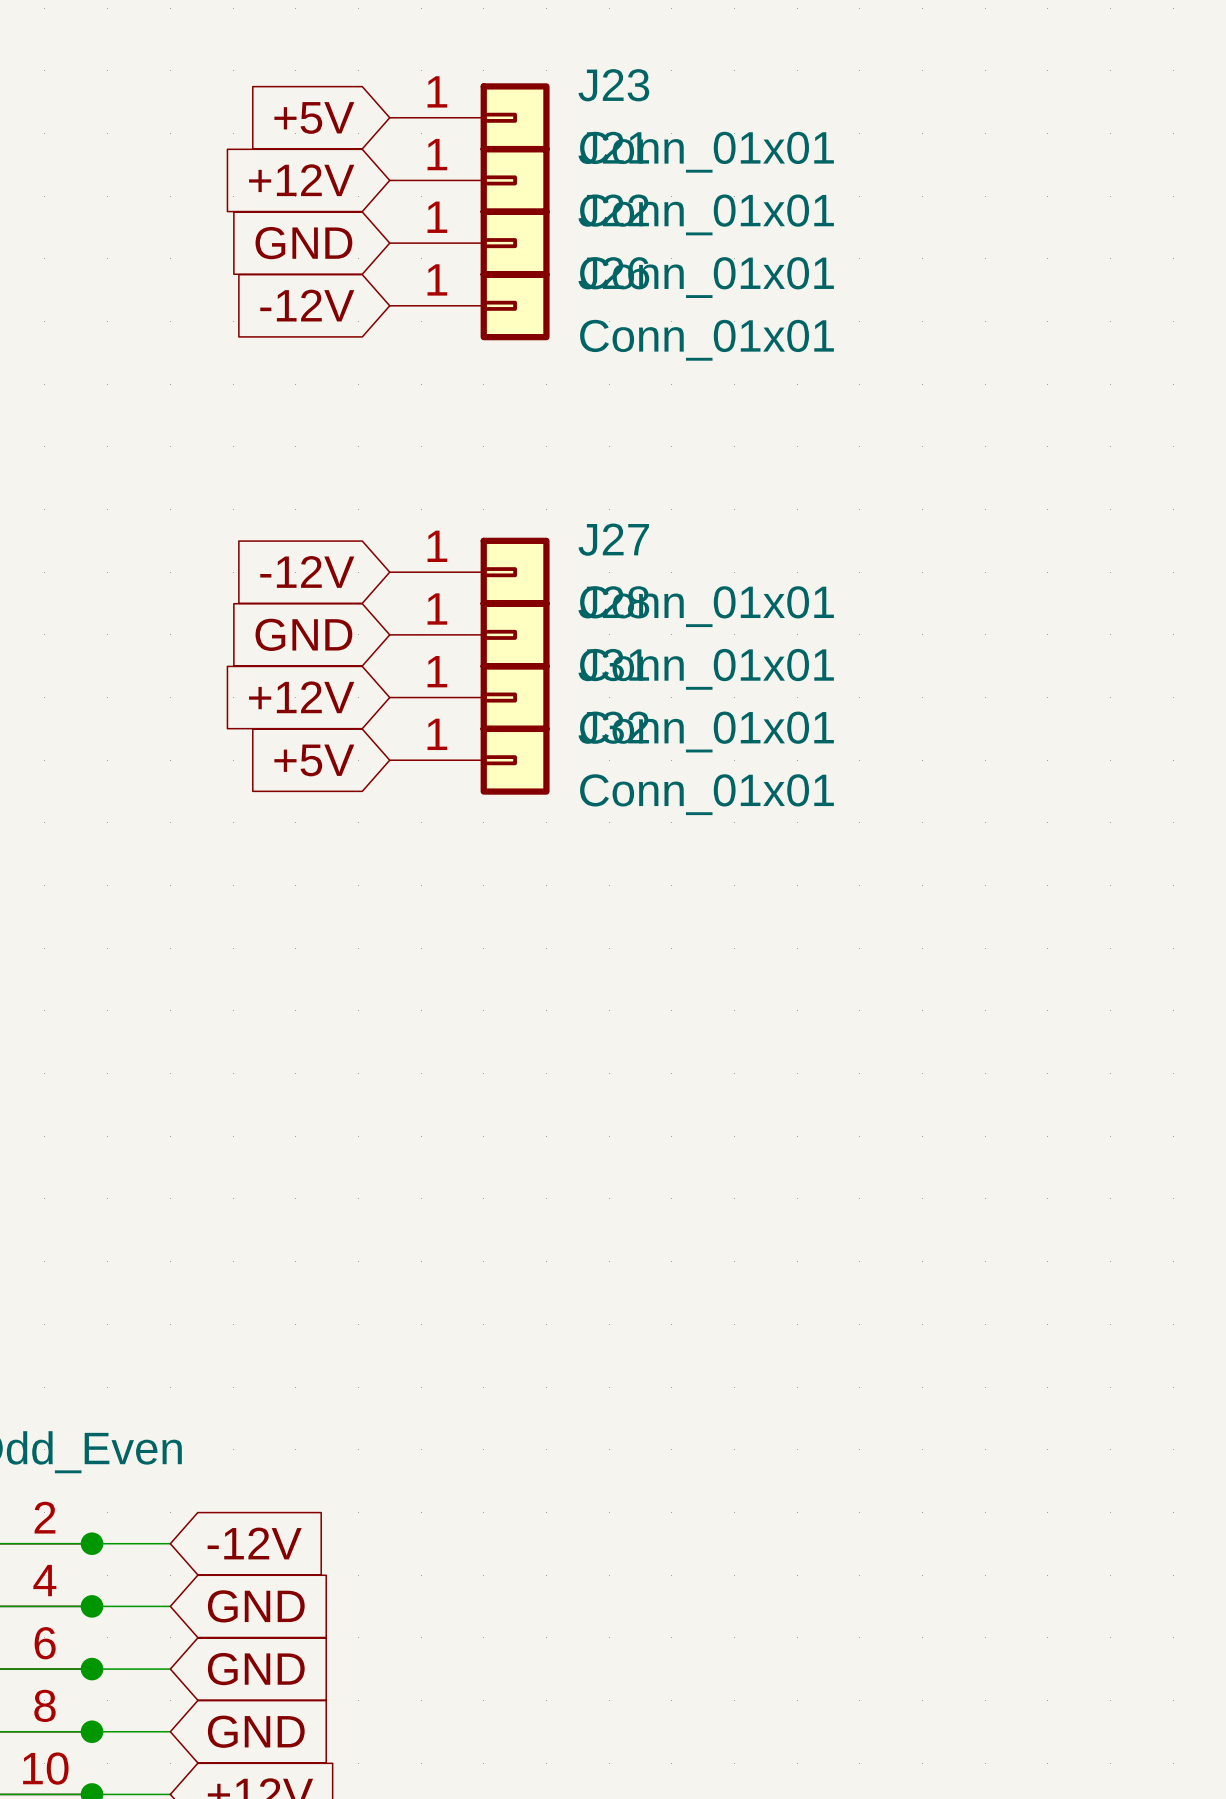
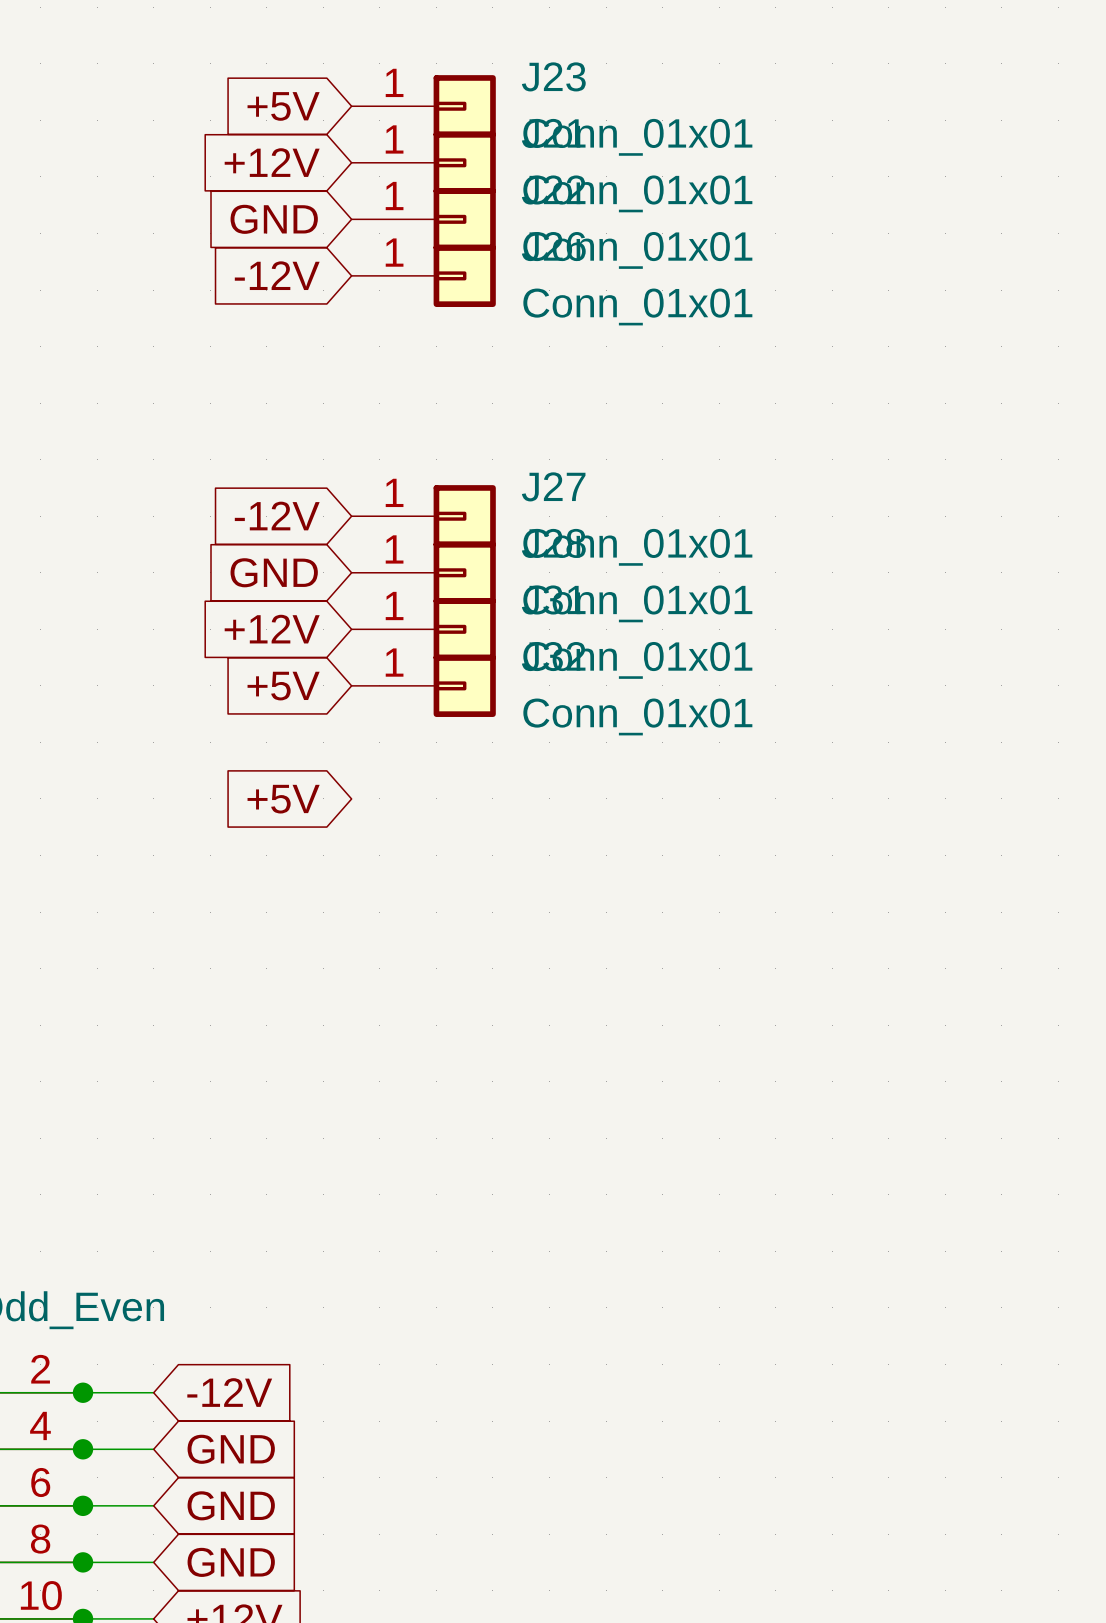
global label: none -> +5V (283, 799)

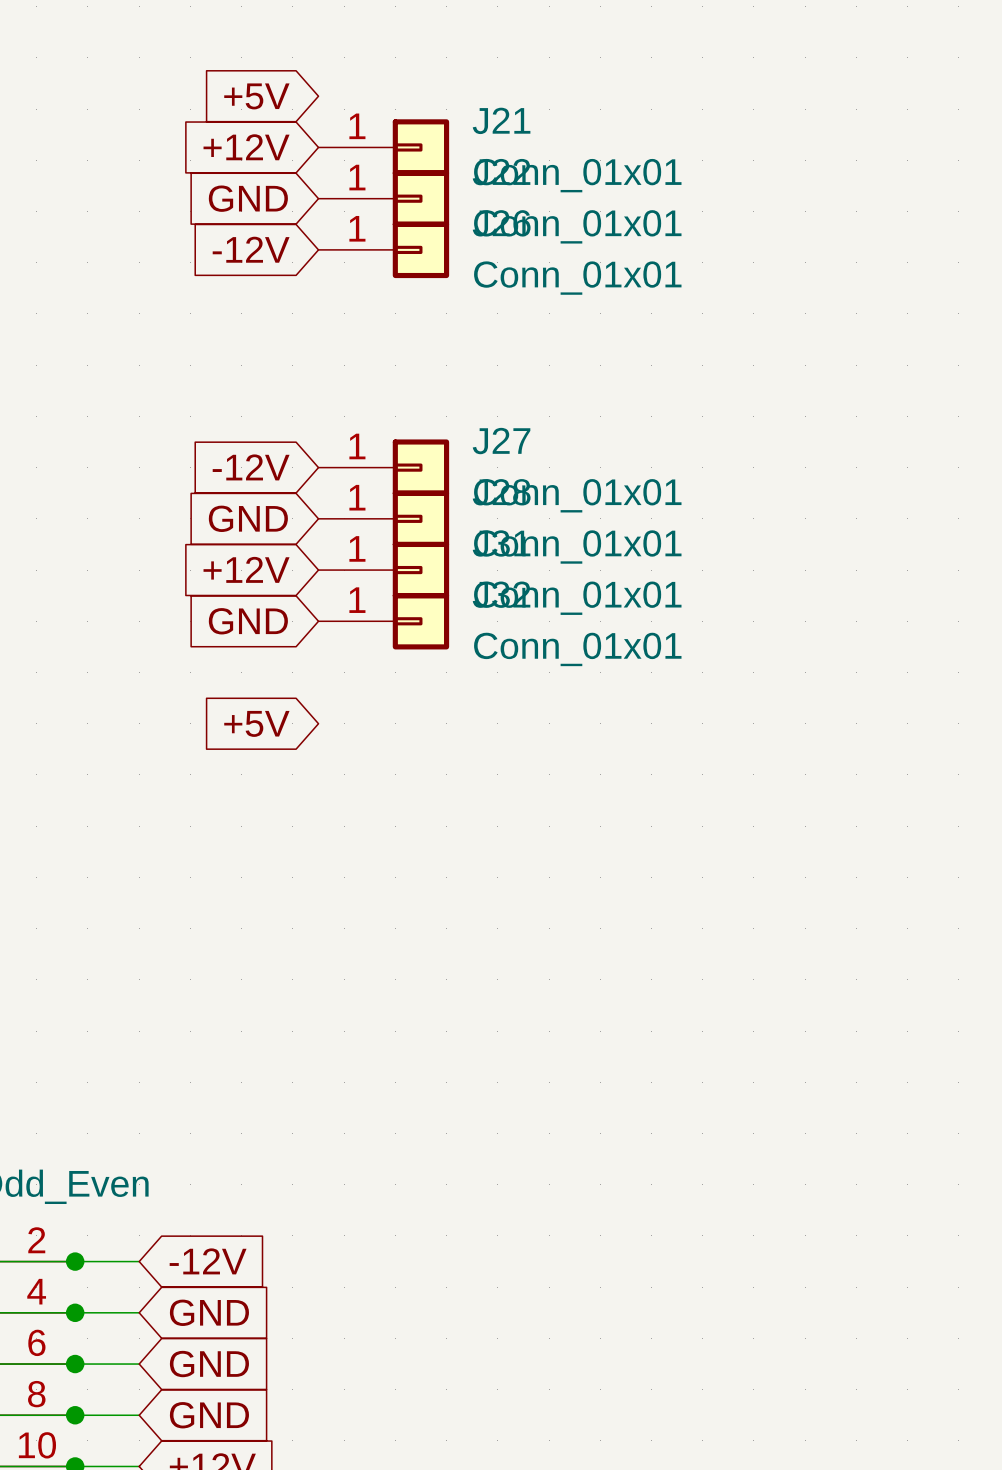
J23: Conn_01x01 (423, 106) -> none
global label: +5V (283, 686) -> GND (248, 621)

